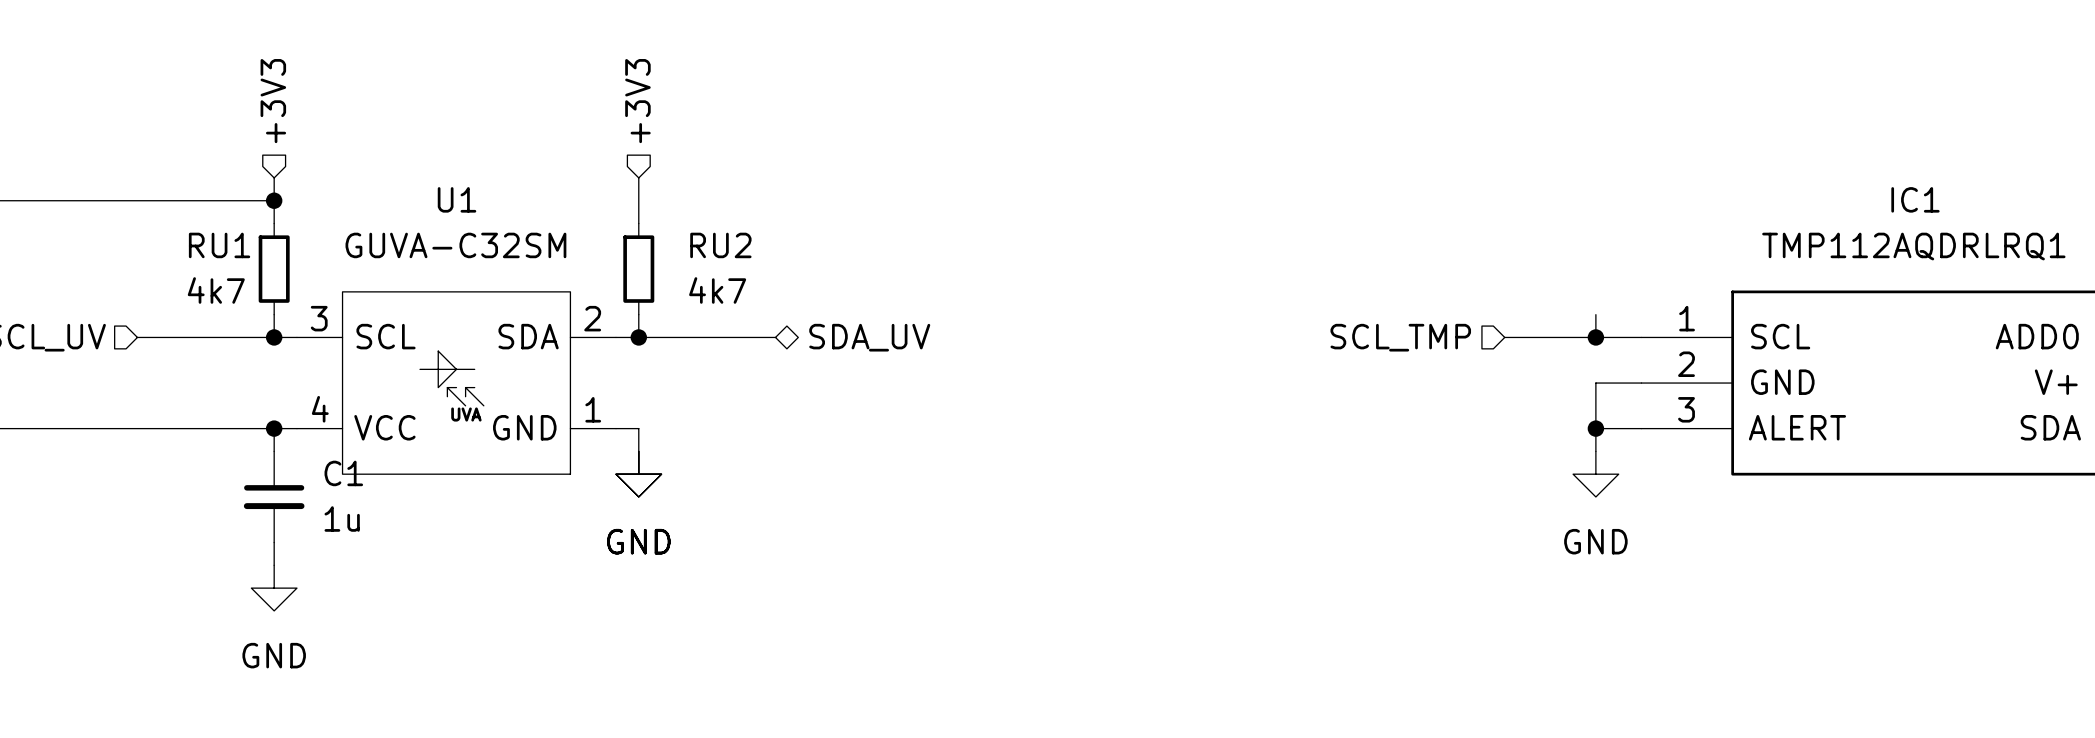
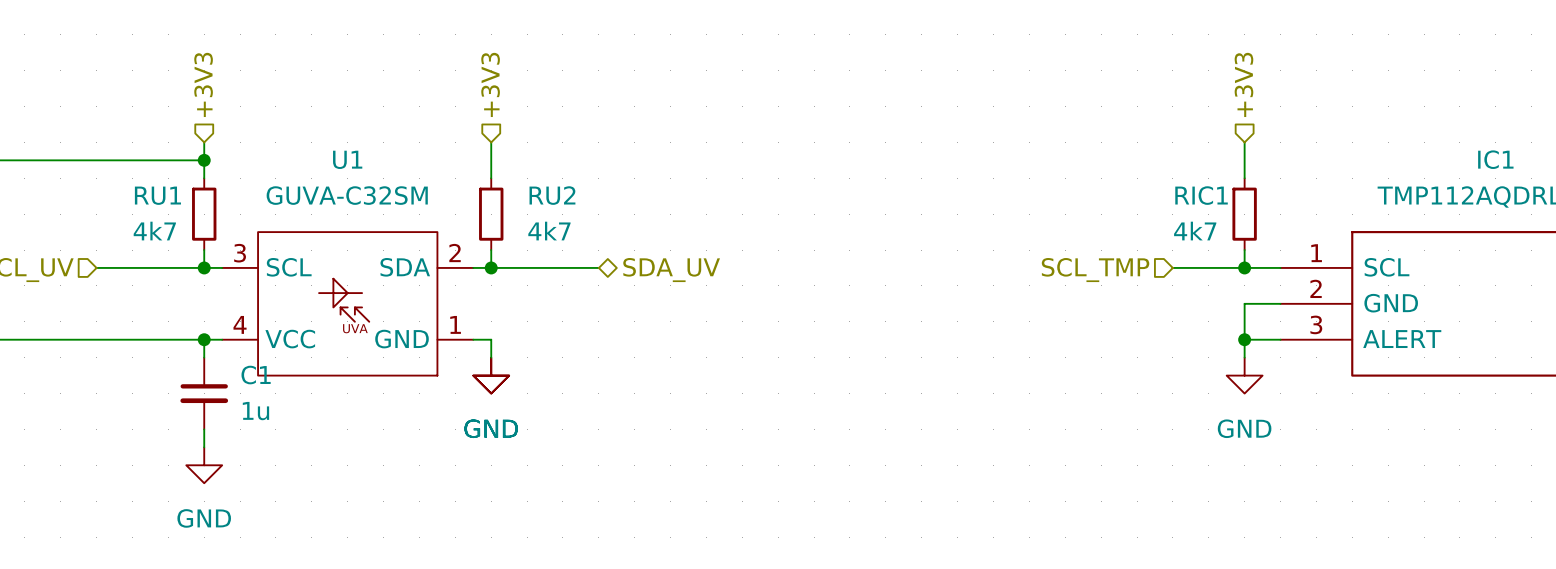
hierarchical label: none -> +3V3 (1243, 84)
wire: none -> (1244, 142) (1244, 178)
RIC1: none -> 4k7 (1244, 214)

